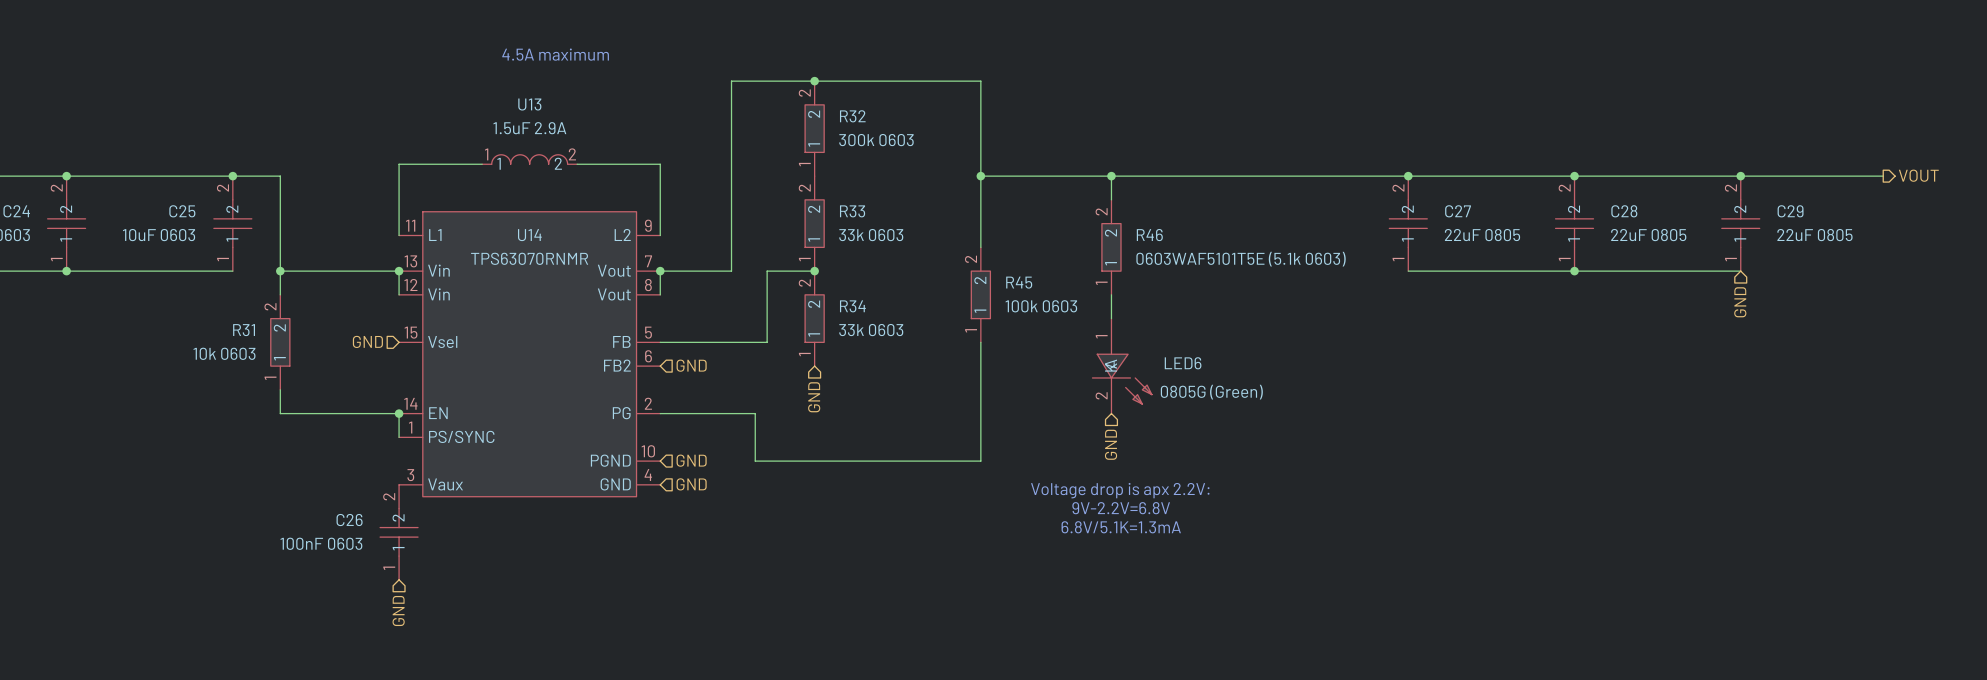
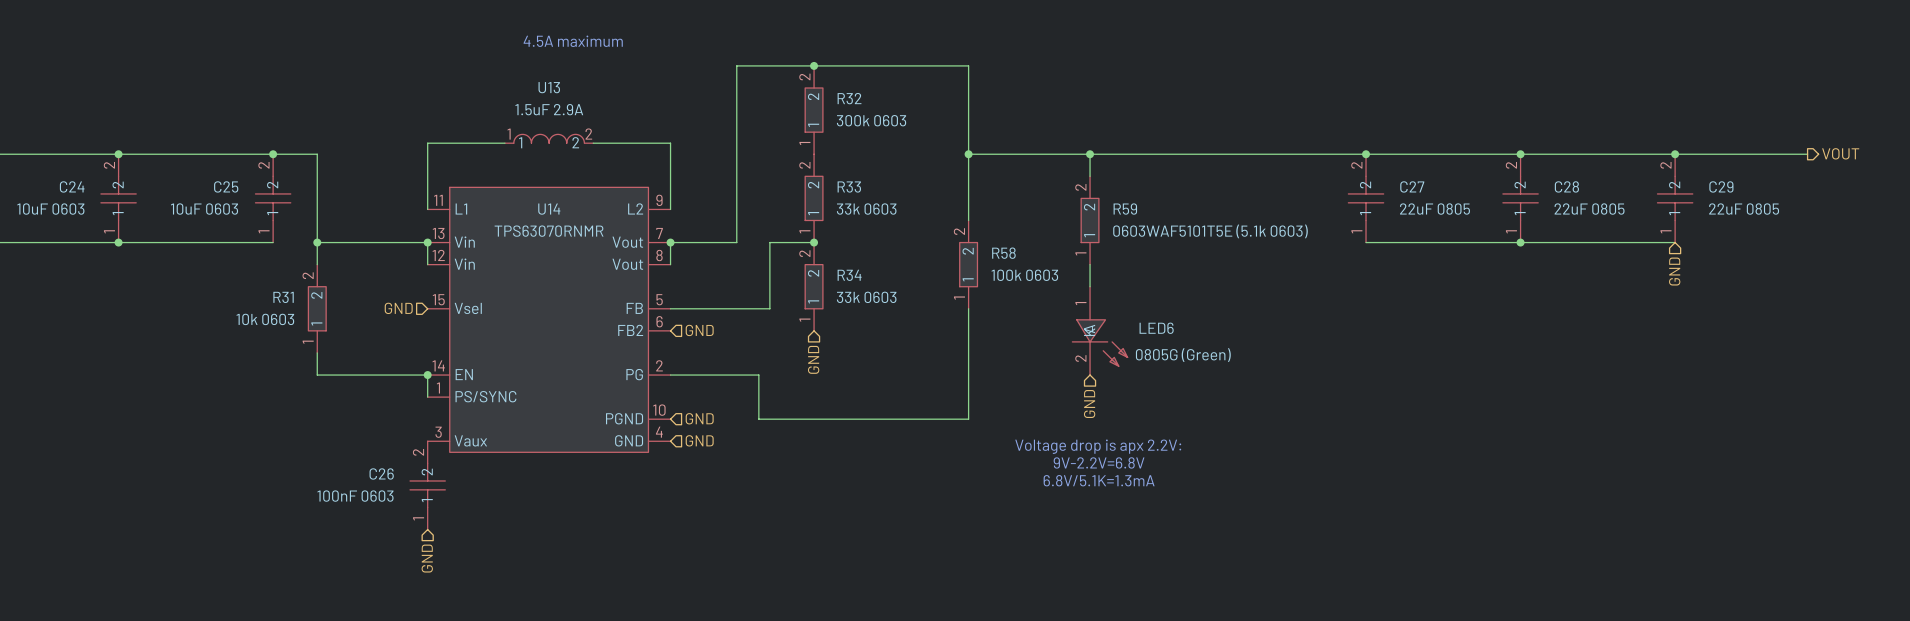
R46 name: R46 (1149, 235) -> R59 (1125, 209)
R45 name: R45 (1019, 282) -> R58 (1003, 253)

